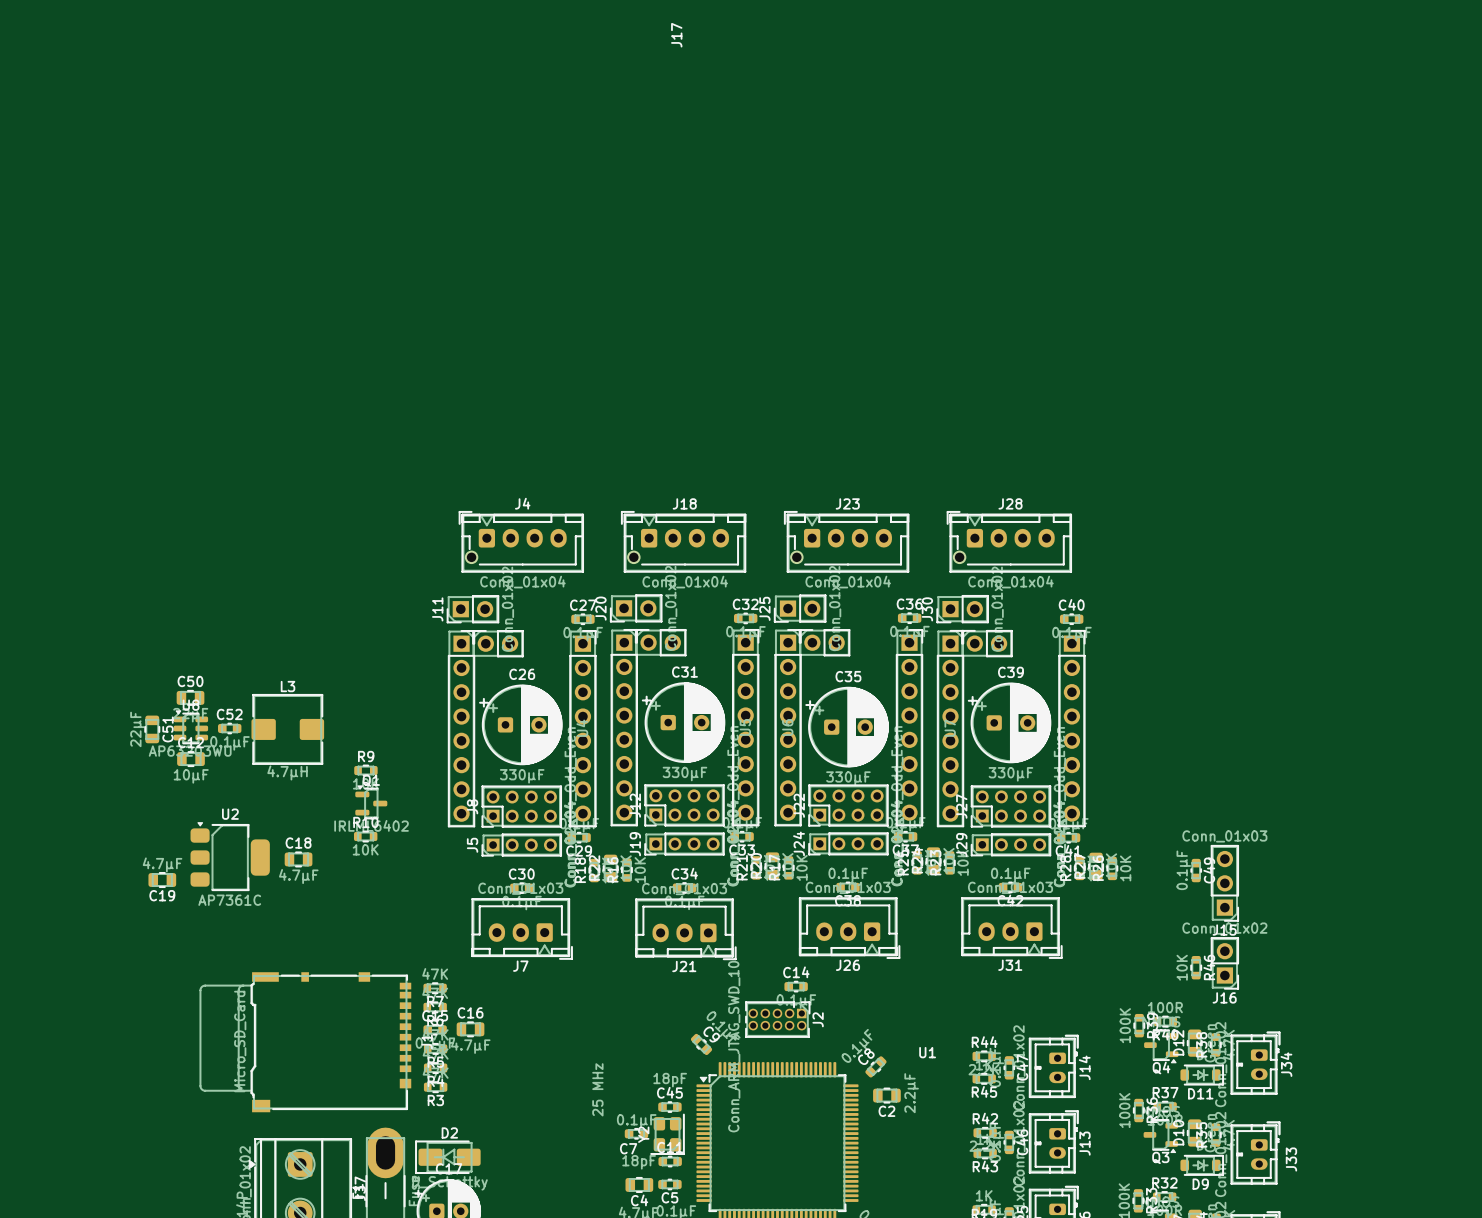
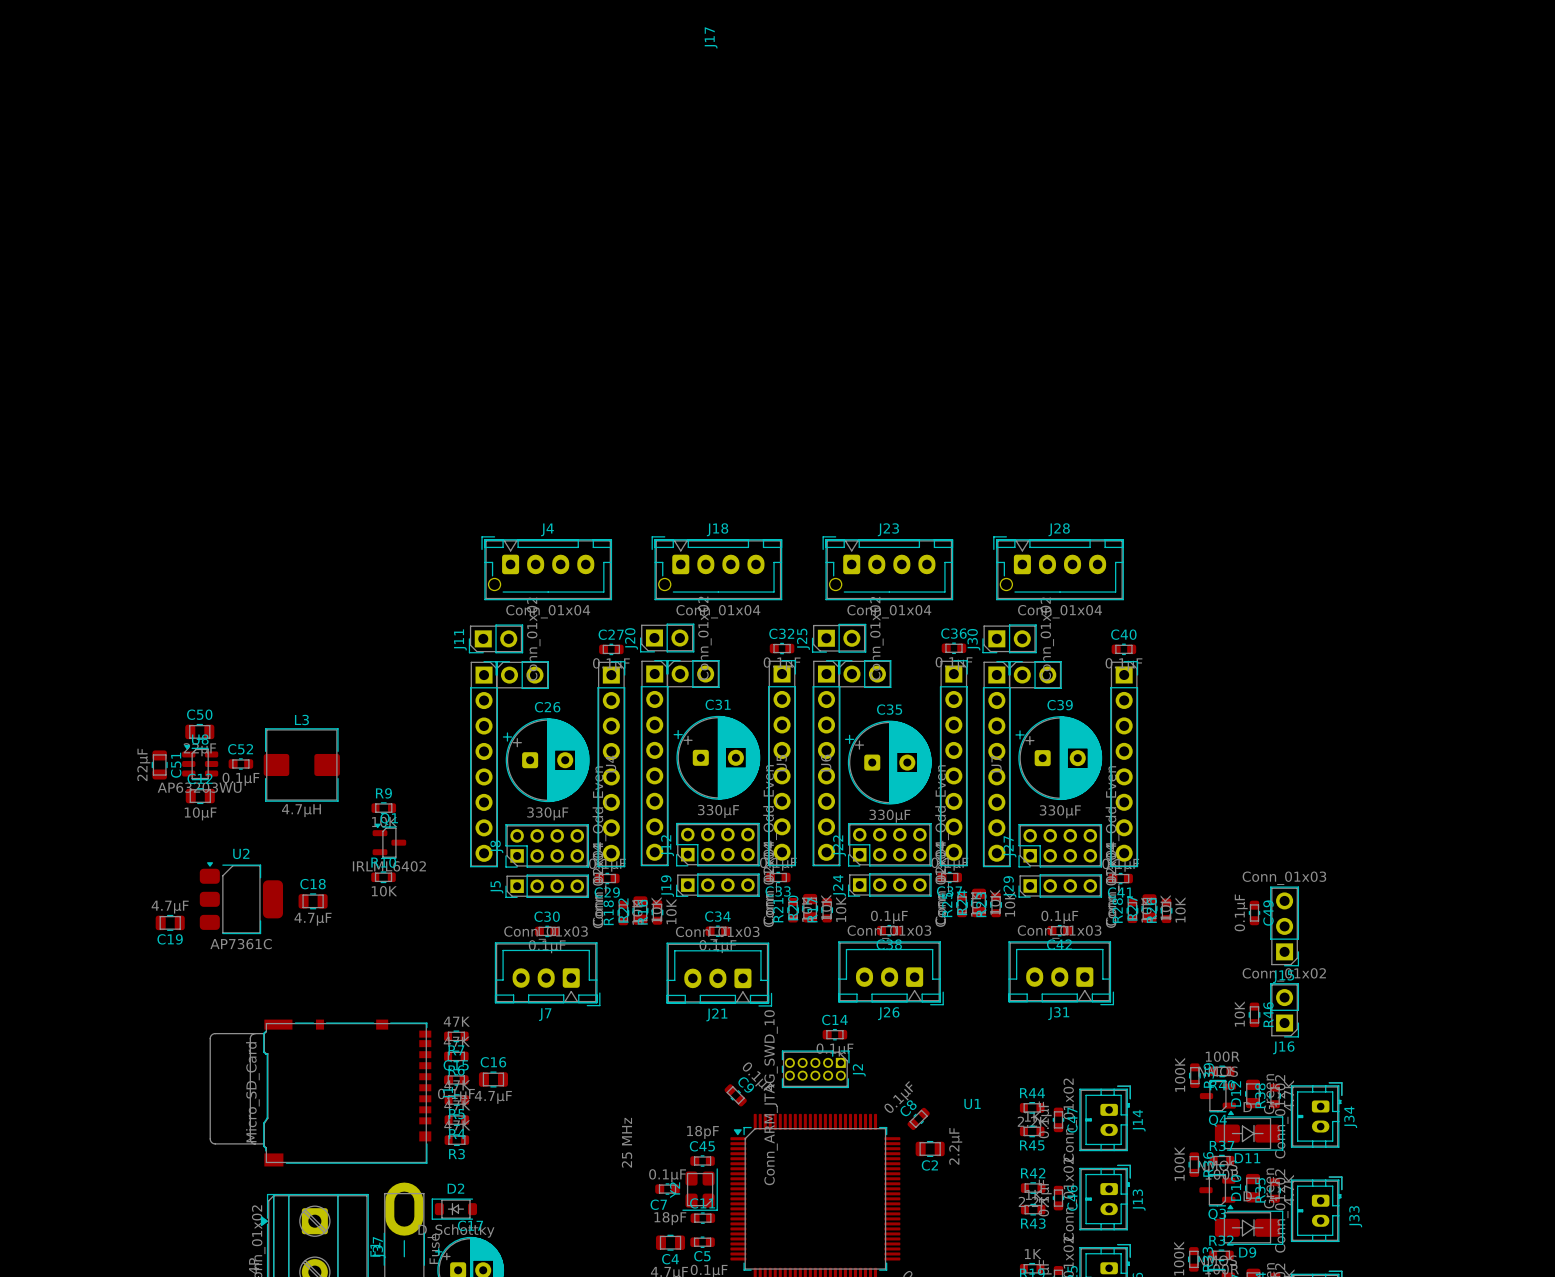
D11 footprint: [1180, 1064, 1224, 1086] -> [1214, 1116, 1284, 1151]
D2 footprint: [415, 1140, 481, 1174] -> [431, 1198, 478, 1220]
D9 footprint: [1180, 1155, 1224, 1176] -> [1214, 1210, 1284, 1245]

